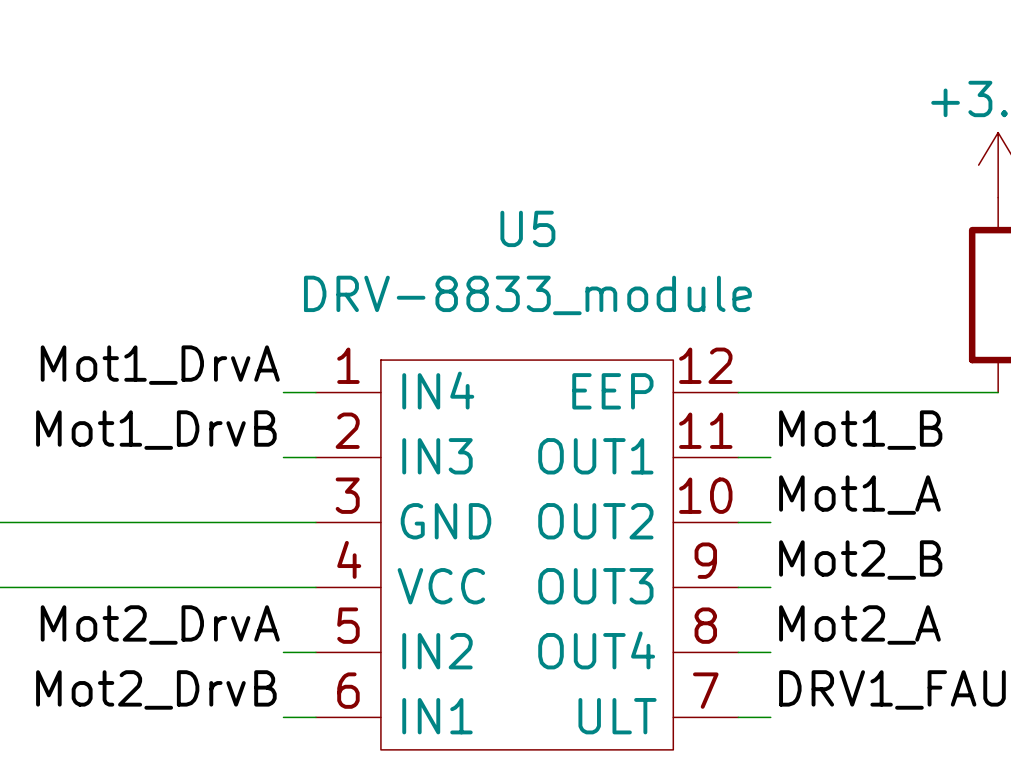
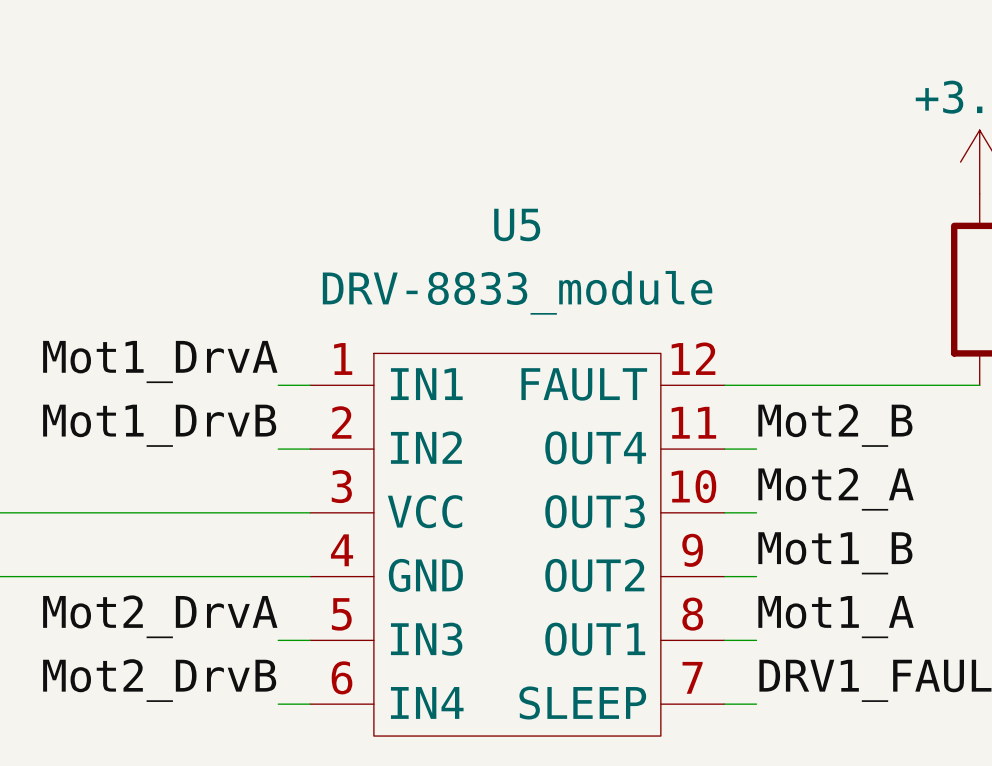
U5 symbol: [315, 360, 739, 750] -> [310, 353, 725, 737]
label: Mot1_B (860, 430) -> Mot2_B (835, 425)
label: Mot1_A (859, 495) -> Mot2_A (836, 489)
label: Mot2_B (860, 560) -> Mot1_B (835, 553)
label: Mot2_A (859, 624) -> Mot1_A (836, 617)

